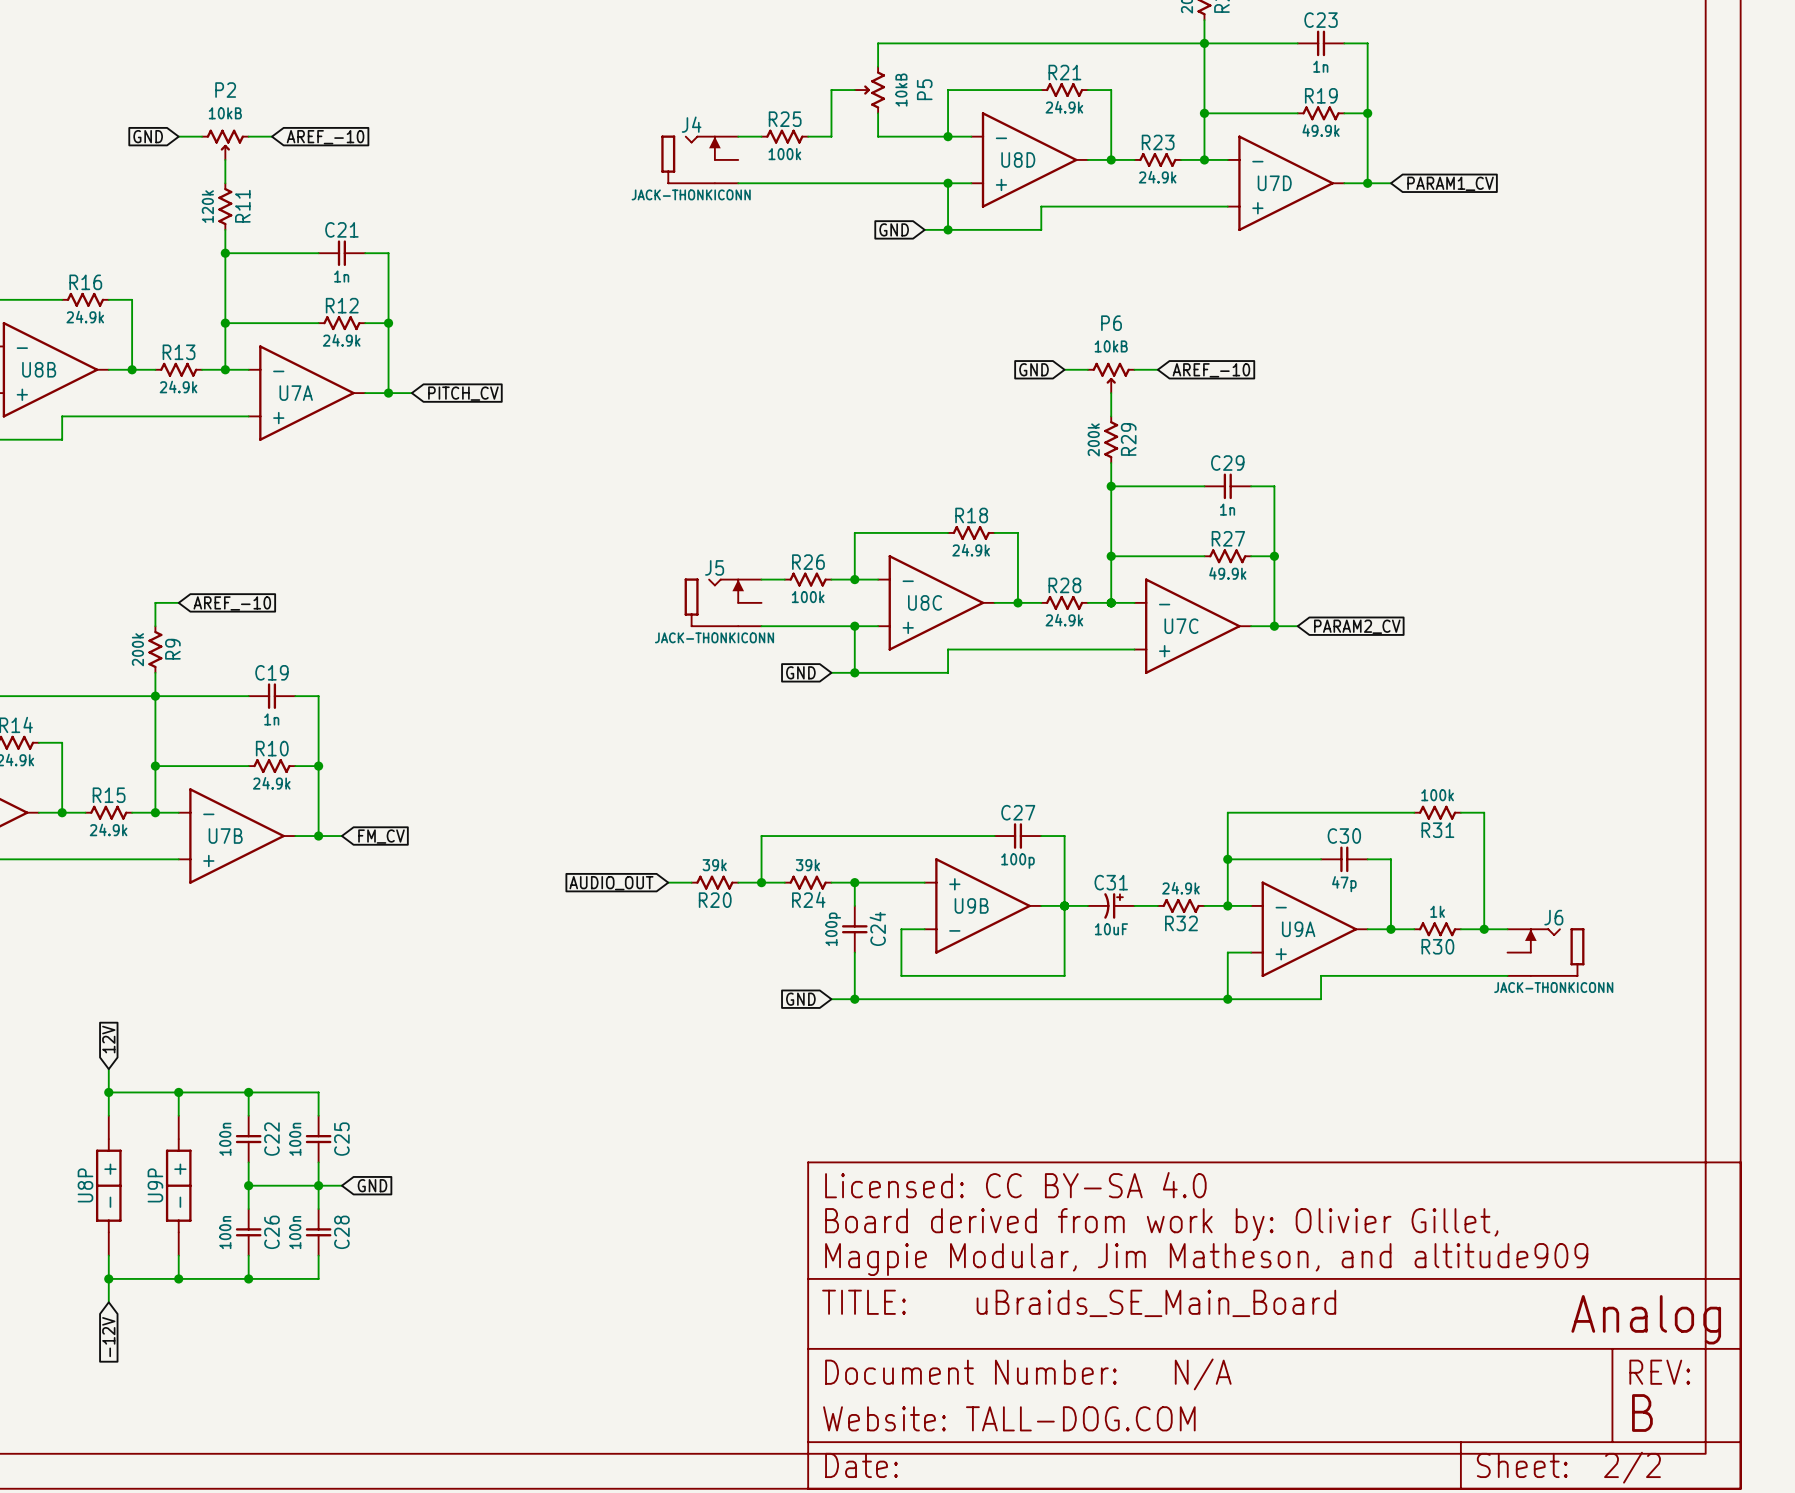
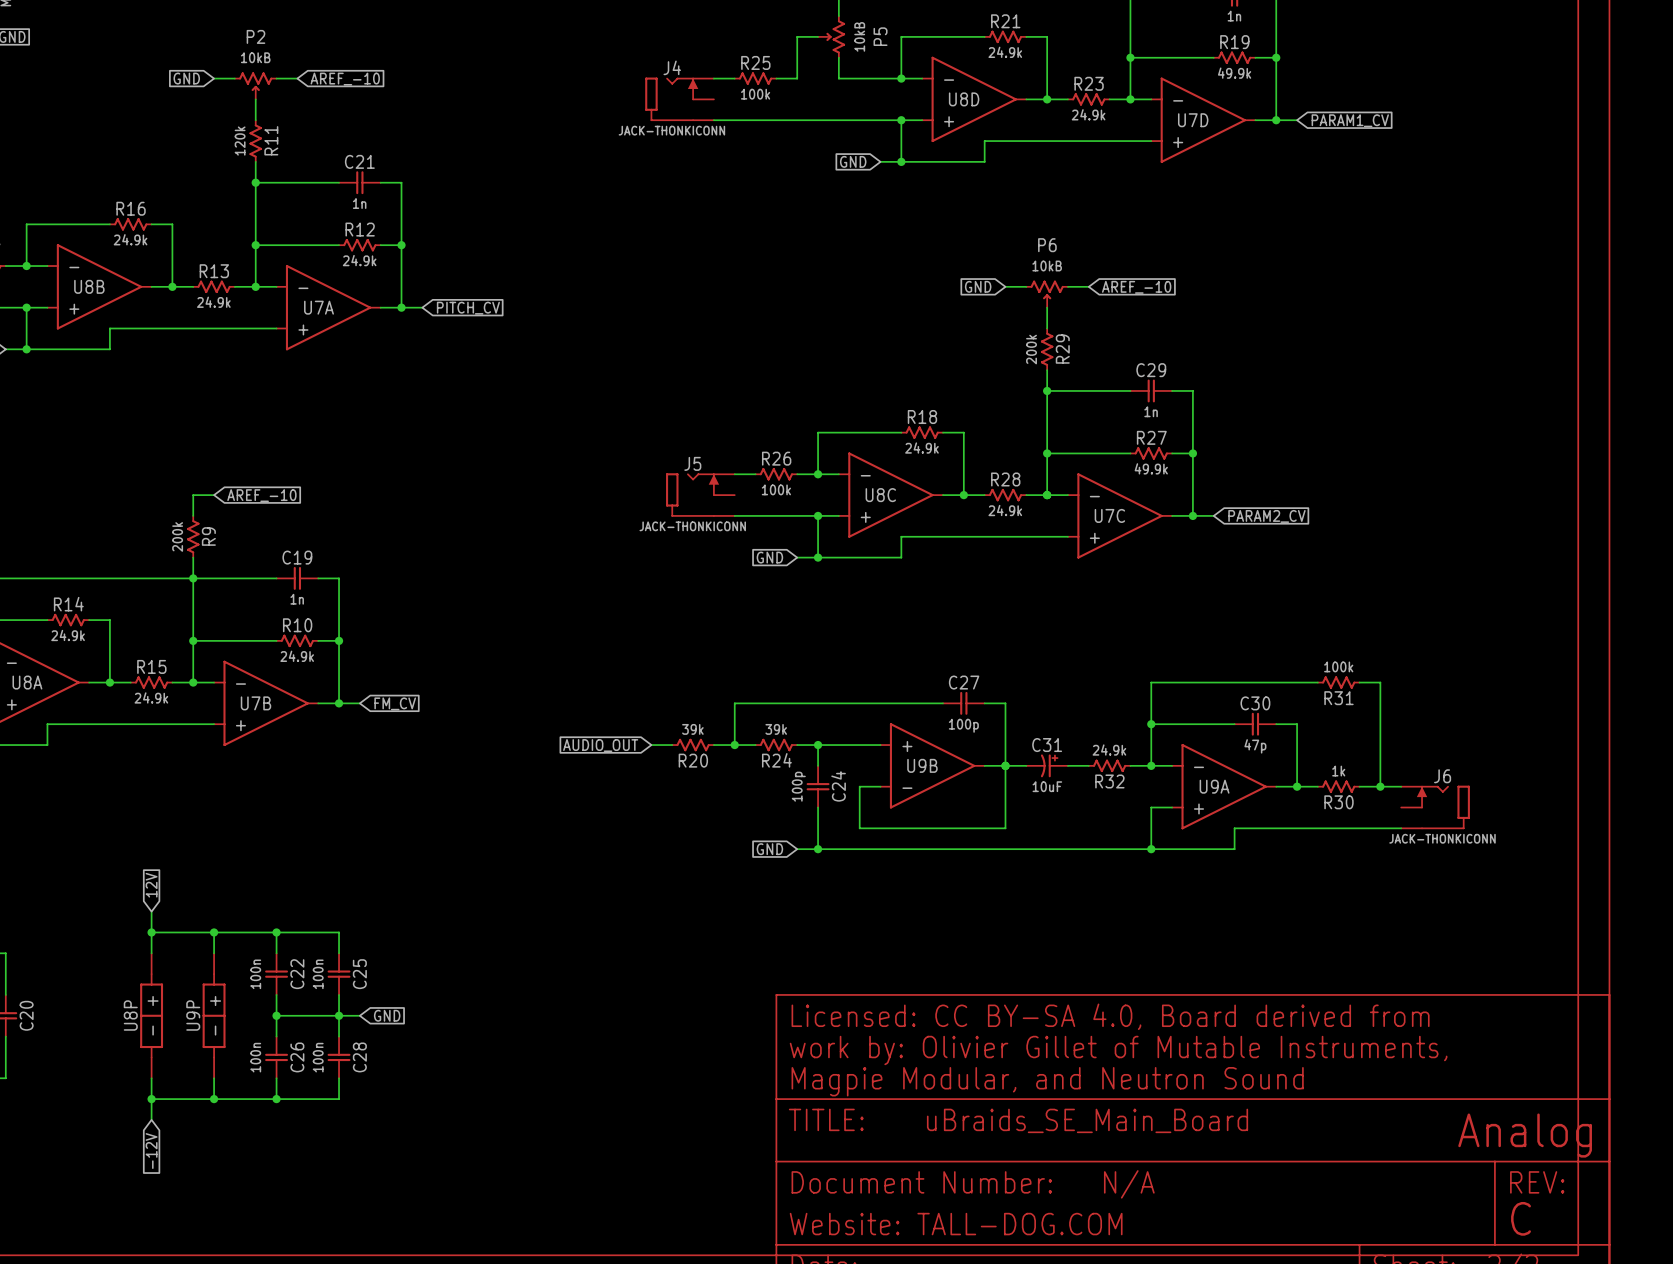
text: Licensed: CC BY-SA 4.0 (1015, 1185) -> Licensed: CC BY-SA 4.0, Board derived from (1110, 1016)
text: Board derived from work by: Olivier Gillet, (1161, 1224) -> work by: Olivier Gillet of Mutable Instruments, (1118, 1050)
text: Magpie Modular, Jim Matheson, and altitude909 (1206, 1259) -> Magpie Modular, and Neutron Sound (1047, 1081)
text: B (1642, 1413) -> C (1521, 1218)

